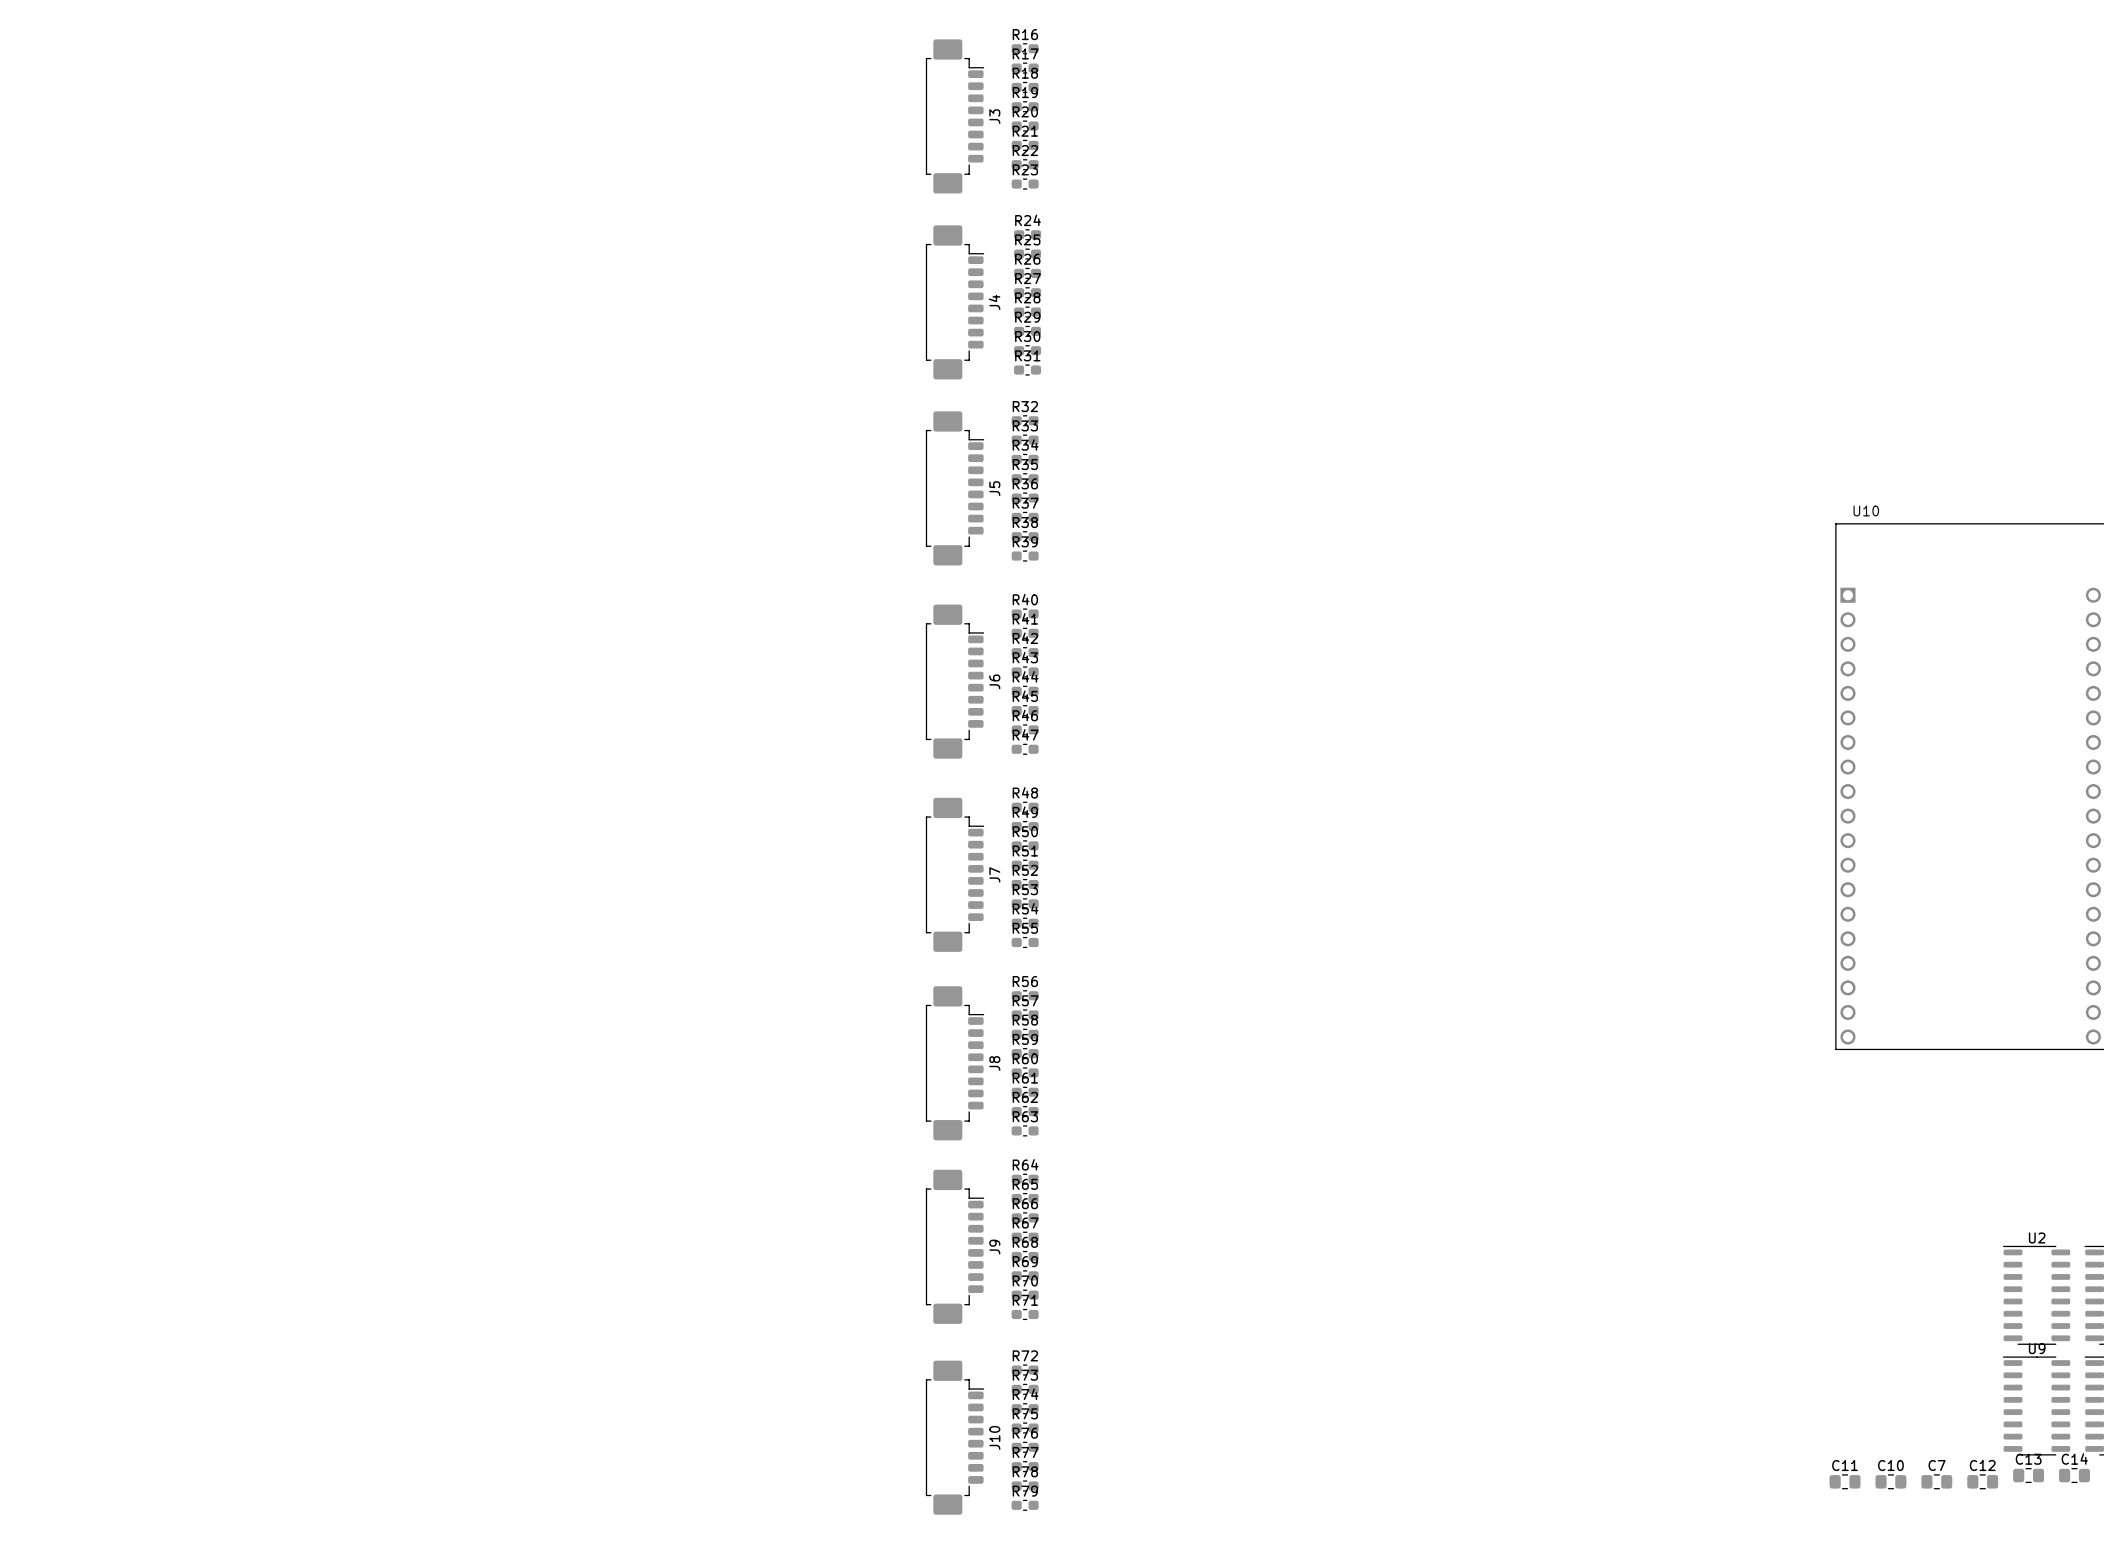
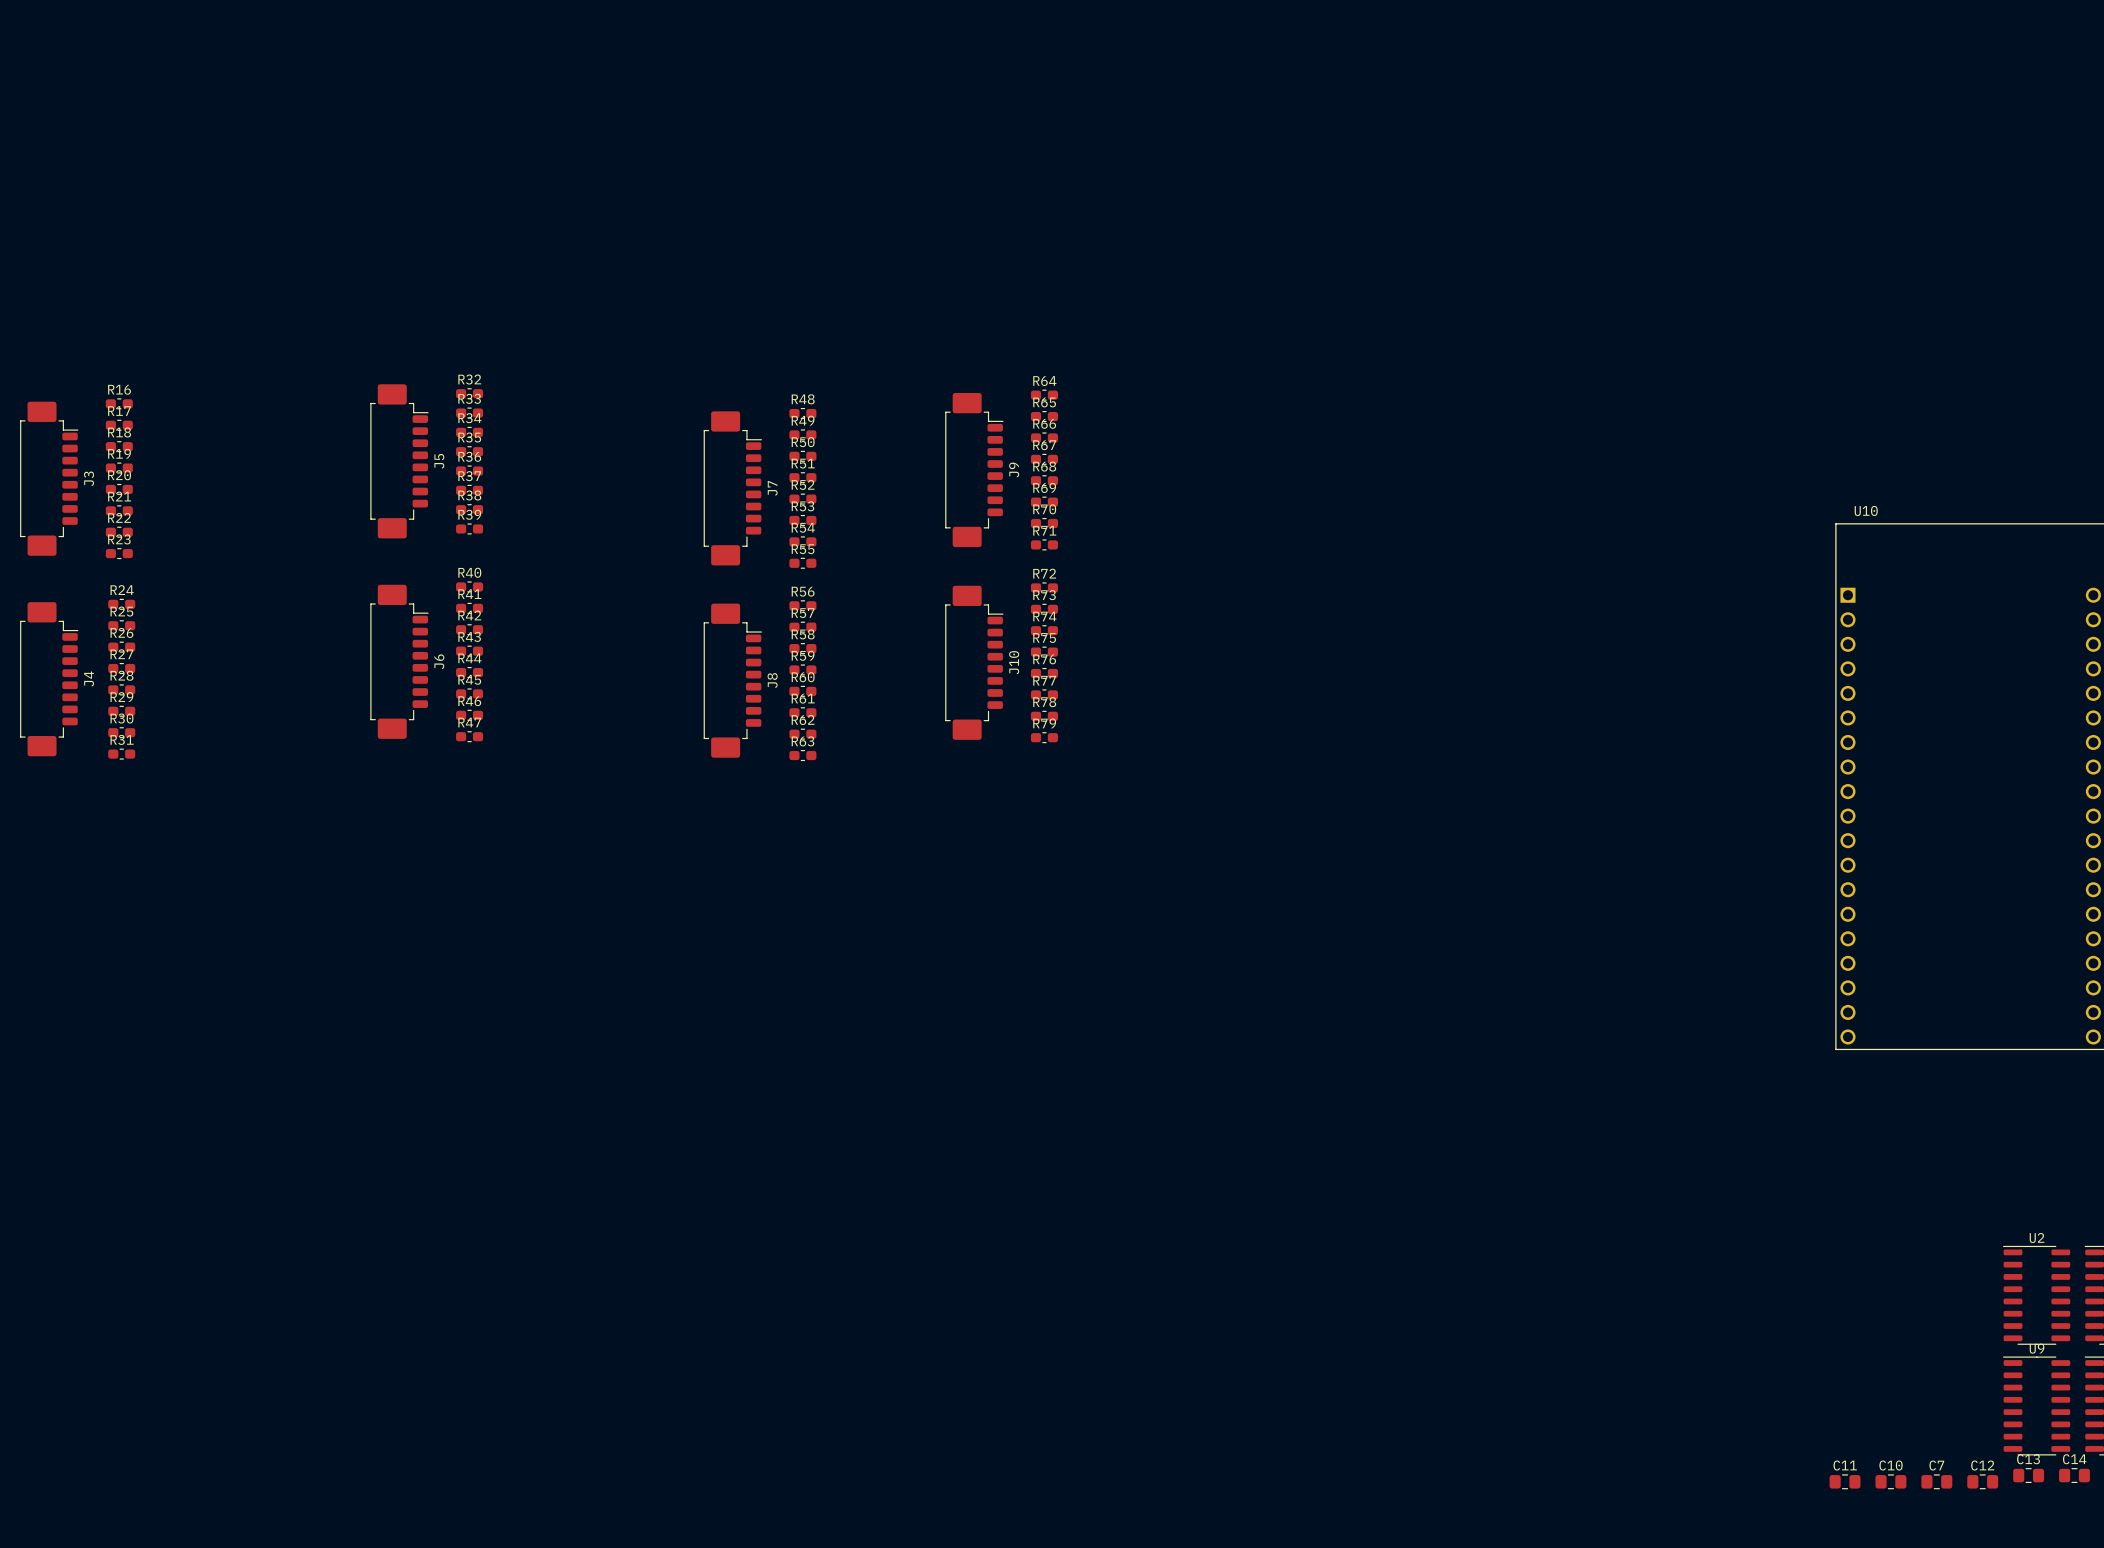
R16 position: (1025, 48) -> (119, 403)
R17 position: (1025, 68) -> (119, 425)
R18 position: (1025, 87) -> (119, 446)
R19 position: (1025, 106) -> (119, 468)
J3 position: (955, 116) -> (49, 478)
R20 position: (1025, 126) -> (119, 489)
R21 position: (1025, 145) -> (119, 510)
R22 position: (1025, 164) -> (119, 532)
R23 position: (1025, 184) -> (119, 553)
R24 position: (1027, 234) -> (121, 604)
R25 position: (1027, 254) -> (121, 625)
R26 position: (1027, 273) -> (121, 647)
R27 position: (1027, 292) -> (121, 668)
J4 position: (955, 302) -> (49, 679)
R28 position: (1027, 312) -> (121, 689)
R29 position: (1027, 331) -> (121, 711)
R30 position: (1027, 350) -> (121, 732)
R31 position: (1027, 370) -> (121, 754)
R32 position: (1025, 420) -> (469, 393)
R33 position: (1025, 440) -> (469, 413)
R34 position: (1025, 459) -> (469, 432)
R35 position: (1025, 478) -> (469, 451)
J5 position: (955, 488) -> (399, 461)
R36 position: (1025, 498) -> (469, 471)
R37 position: (1025, 517) -> (469, 490)
R38 position: (1025, 536) -> (469, 509)
R39 position: (1025, 556) -> (469, 528)
R40 position: (1025, 613) -> (469, 586)
R41 position: (1025, 633) -> (469, 608)
R42 position: (1025, 652) -> (469, 629)
R43 position: (1025, 671) -> (469, 651)
J6 position: (955, 681) -> (399, 661)
R44 position: (1025, 691) -> (469, 672)
R45 position: (1025, 710) -> (469, 693)
R46 position: (1025, 729) -> (469, 715)
R47 position: (1025, 749) -> (469, 736)
R48 position: (1025, 807) -> (802, 413)
R49 position: (1025, 826) -> (802, 434)
R50 position: (1025, 845) -> (802, 456)
R51 position: (1025, 865) -> (802, 477)
J7 position: (955, 874) -> (732, 488)
R52 position: (1025, 884) -> (802, 499)
R53 position: (1025, 903) -> (802, 520)
R54 position: (1025, 923) -> (802, 541)
R55 position: (1025, 942) -> (802, 563)
R56 position: (1025, 995) -> (802, 605)
R57 position: (1025, 1014) -> (802, 627)
R58 position: (1025, 1034) -> (802, 648)
R59 position: (1025, 1053) -> (802, 669)
J8 position: (955, 1063) -> (732, 680)
R60 position: (1025, 1072) -> (802, 691)
R61 position: (1025, 1092) -> (802, 712)
R62 position: (1025, 1111) -> (802, 734)
R63 position: (1025, 1130) -> (802, 755)
R64 position: (1025, 1179) -> (1044, 395)
R65 position: (1025, 1198) -> (1044, 416)
R66 position: (1025, 1217) -> (1044, 437)
R67 position: (1025, 1237) -> (1044, 459)
J9 position: (955, 1246) -> (974, 470)
R68 position: (1025, 1256) -> (1044, 480)
R69 position: (1025, 1275) -> (1044, 502)
R70 position: (1025, 1295) -> (1044, 523)
R71 position: (1025, 1314) -> (1044, 544)
R72 position: (1025, 1370) -> (1044, 587)
R73 position: (1025, 1389) -> (1044, 609)
R74 position: (1025, 1408) -> (1044, 630)
R75 position: (1025, 1428) -> (1044, 652)
J10 position: (955, 1437) -> (974, 662)
R76 position: (1025, 1447) -> (1044, 673)
R77 position: (1025, 1466) -> (1044, 694)
R78 position: (1025, 1485) -> (1044, 716)
R79 position: (1025, 1505) -> (1044, 737)

